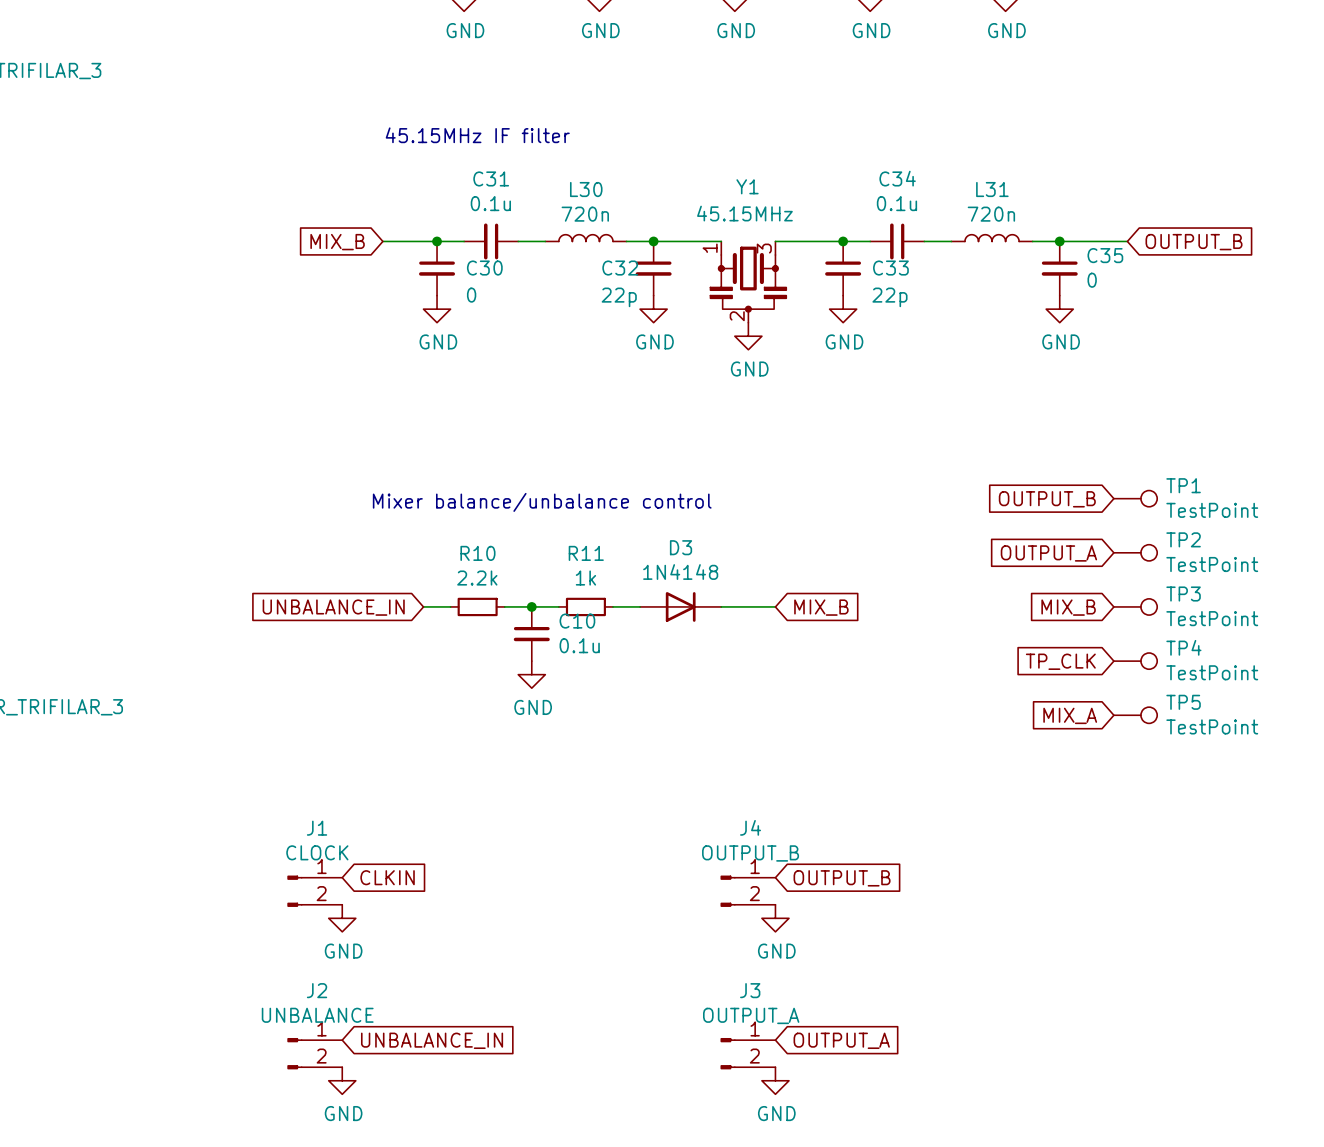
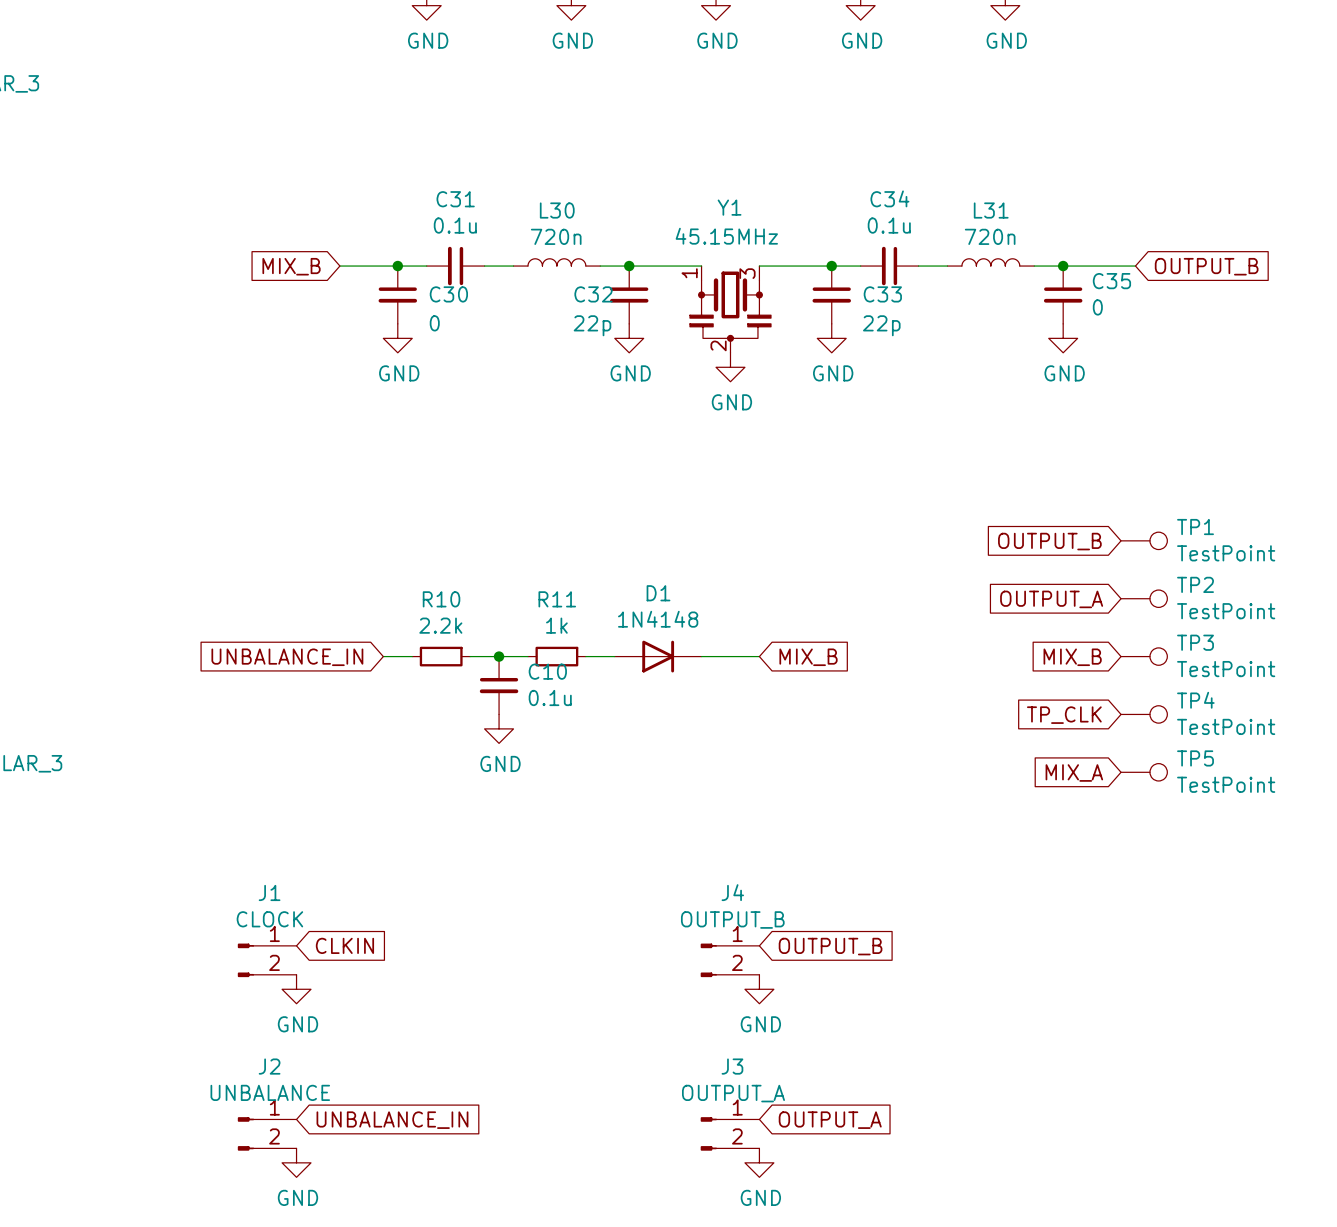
text: 45.15MHz IF filter (477, 135) -> none
text: Mixer balance/unbalance control (542, 502) -> none
D3 name: D3 (681, 547) -> D1 (658, 593)

